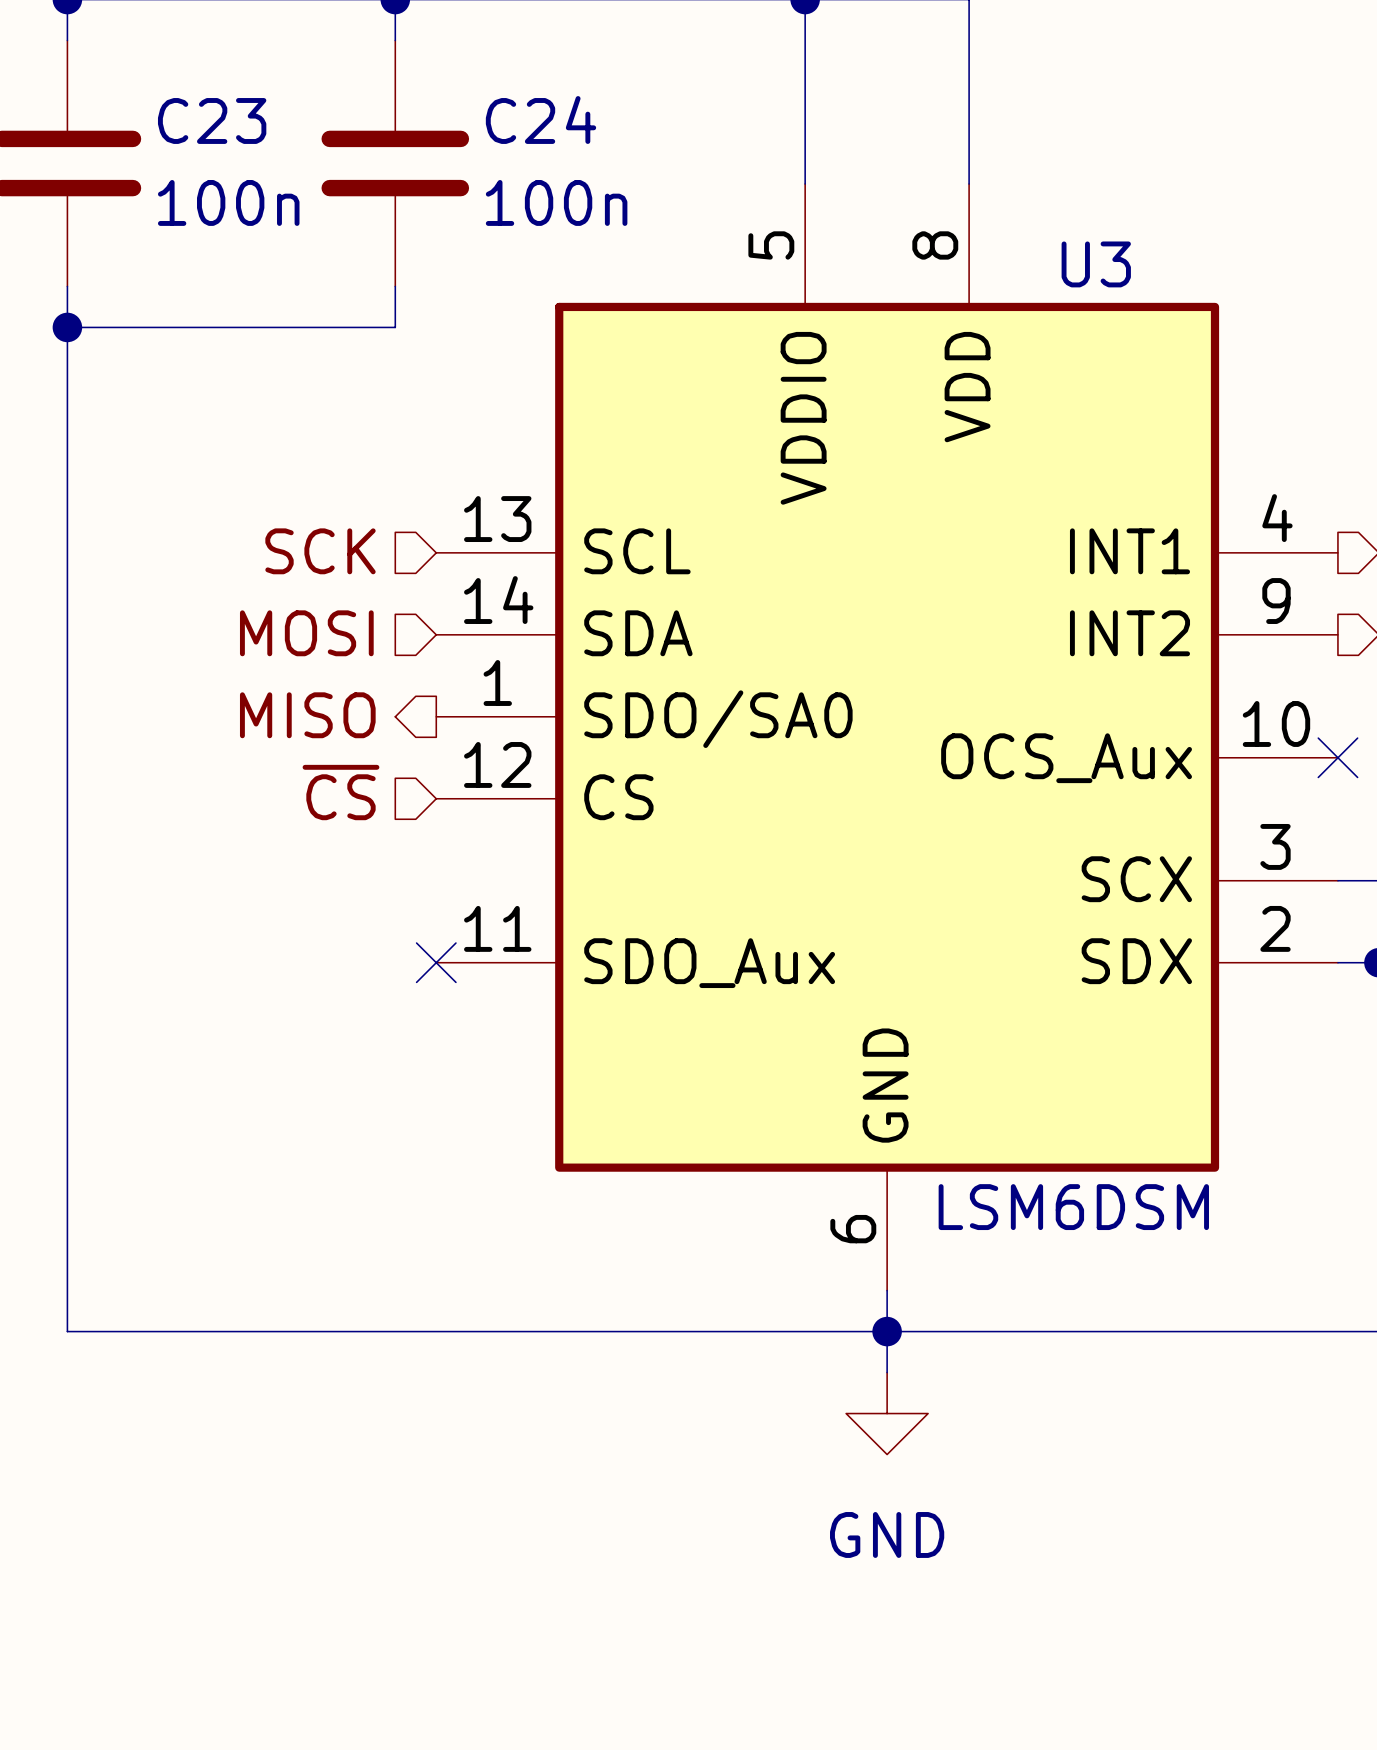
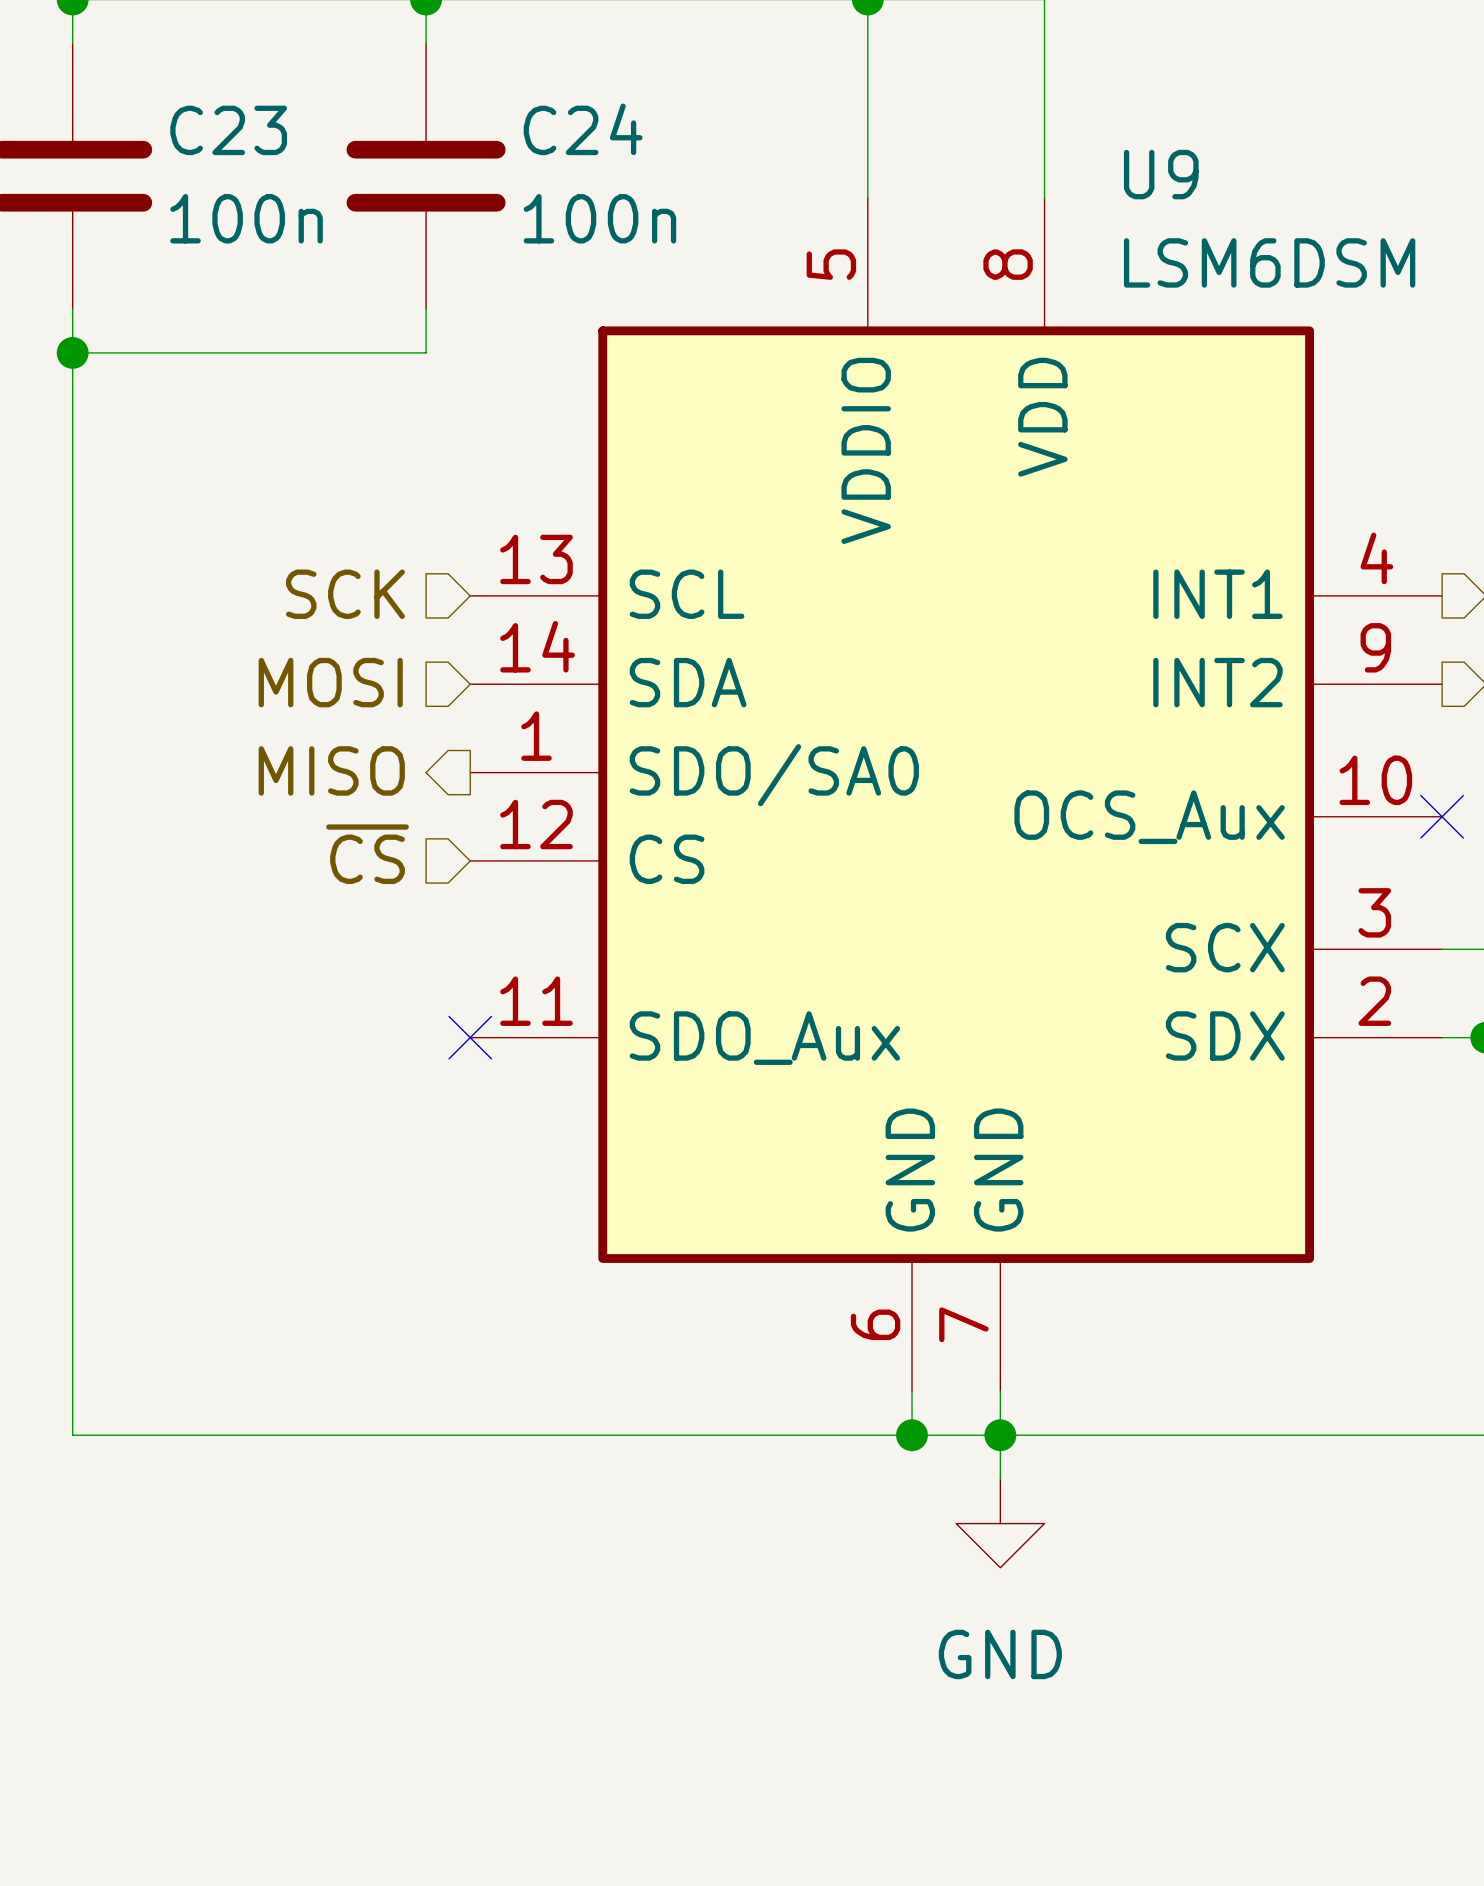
U3: LSM6DSM (887, 737) -> none
U9: none -> LSM6DSM (956, 794)
wire: none -> (911, 1391) (911, 1435)
wire: (887, 1290) (887, 1372) -> (1000, 1391) (1000, 1479)
junction: none -> (911, 1435)
junction: (887, 1331) -> none
junction: none -> (1000, 1435)
power symbol position: GND (887, 1413) -> GND (1000, 1523)

